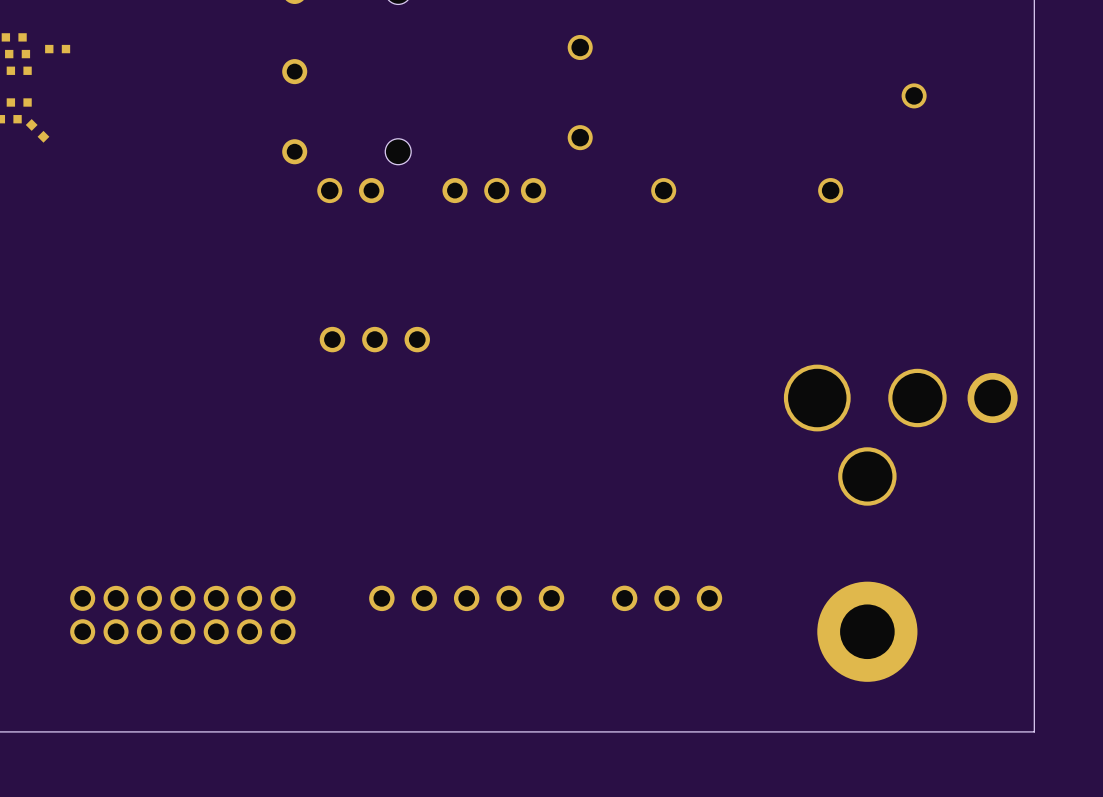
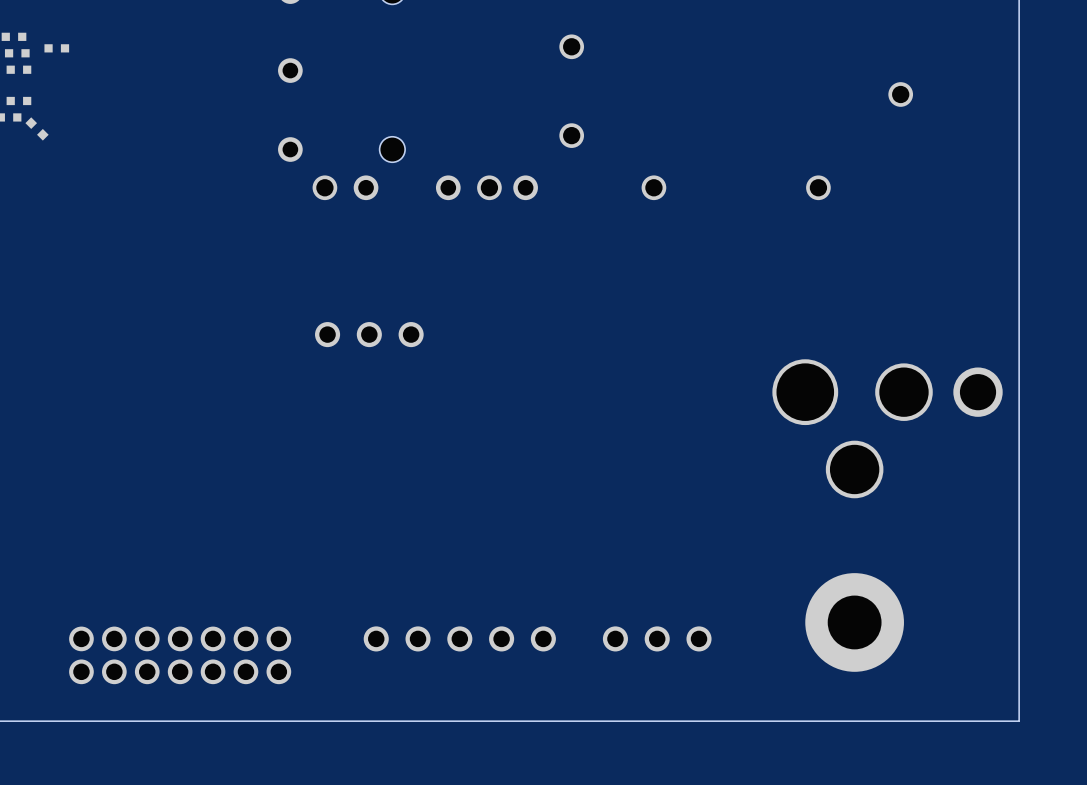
part position: (466, 598) -> (459, 638)
part position: (667, 598) -> (657, 638)
part position: (182, 615) -> (180, 655)

